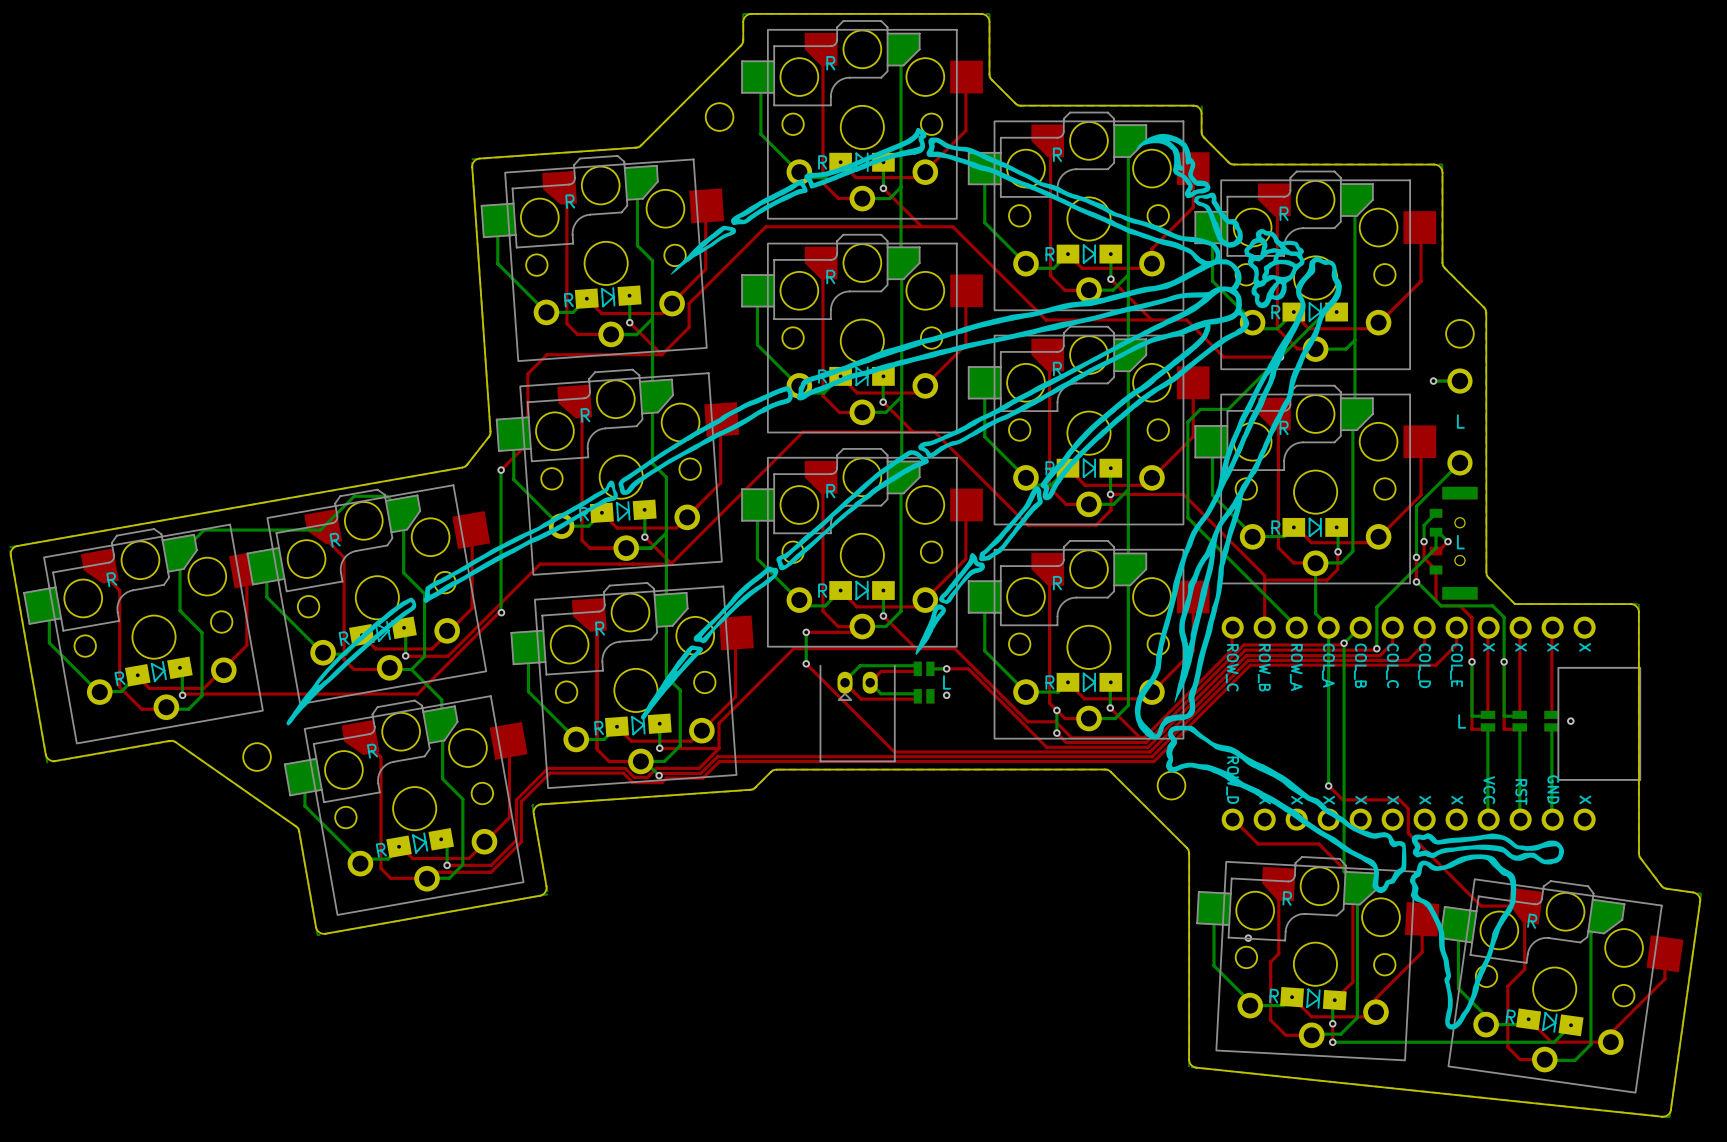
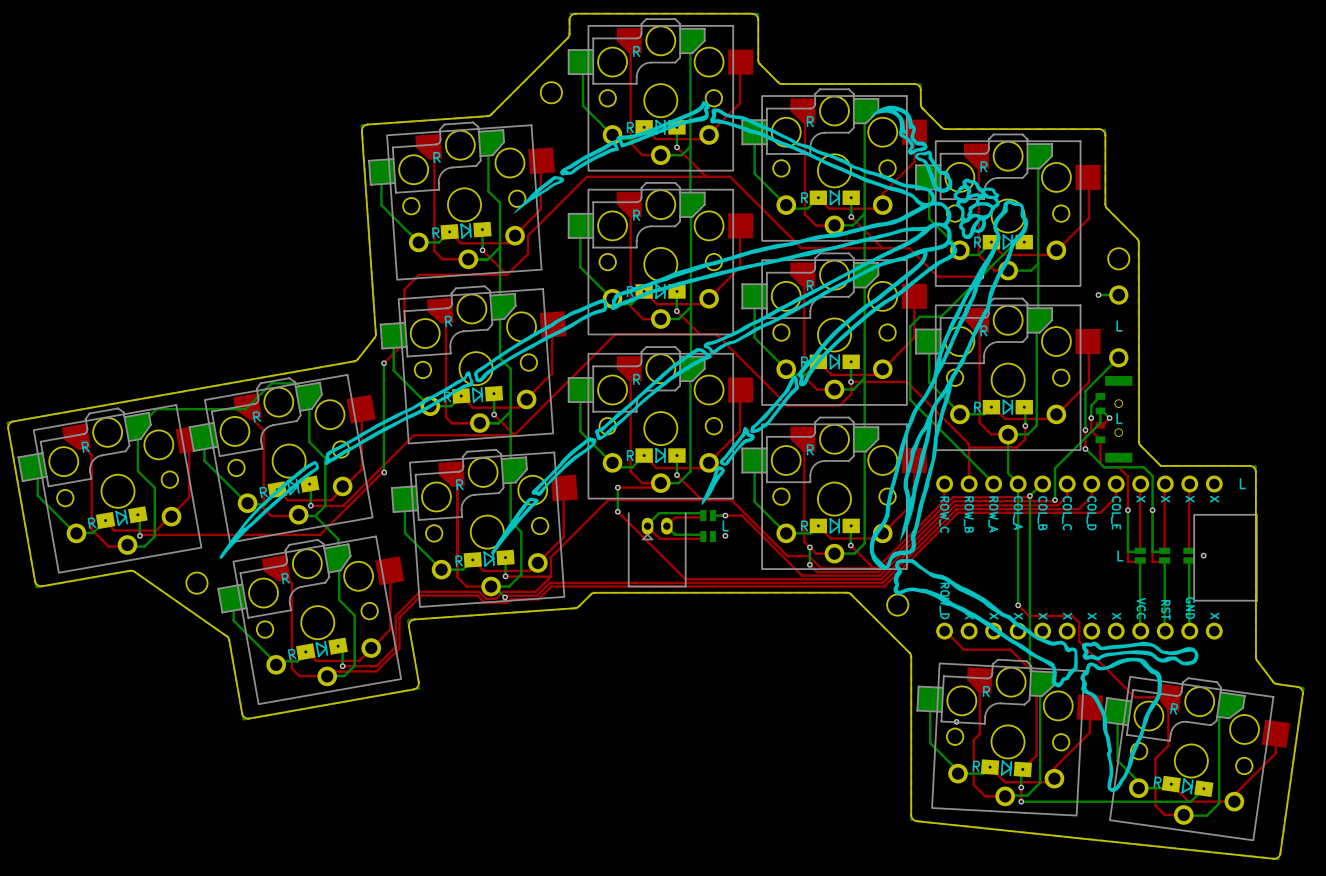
part text: none -> L (1242, 483)

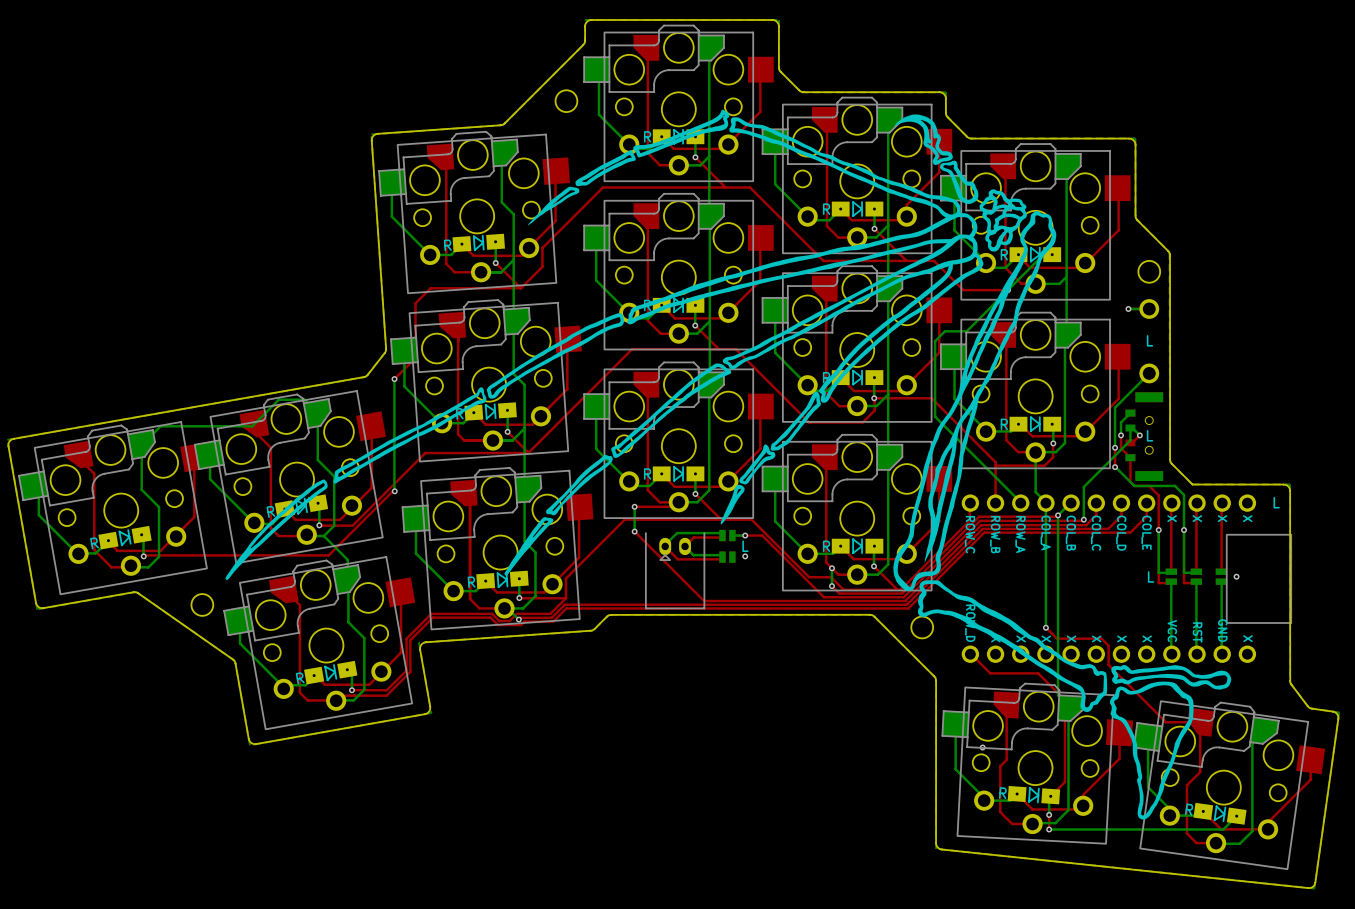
part text: R (636, 51) -> none
part text: R (810, 121) -> none
part text: R (436, 157) -> none
part text: R (983, 166) -> none
part text: R (636, 215) -> none
part text: R (810, 285) -> none
part text: R (448, 321) -> none
part text: R (983, 330) -> none
part text: R (636, 379) -> none
part text: R (256, 416) -> none
part text: R (85, 447) -> none
part text: R (810, 449) -> none
part text: R (459, 484) -> none
part text: R (285, 578) -> none
part text: R (986, 691) -> none
part text: R (1174, 708) -> none

